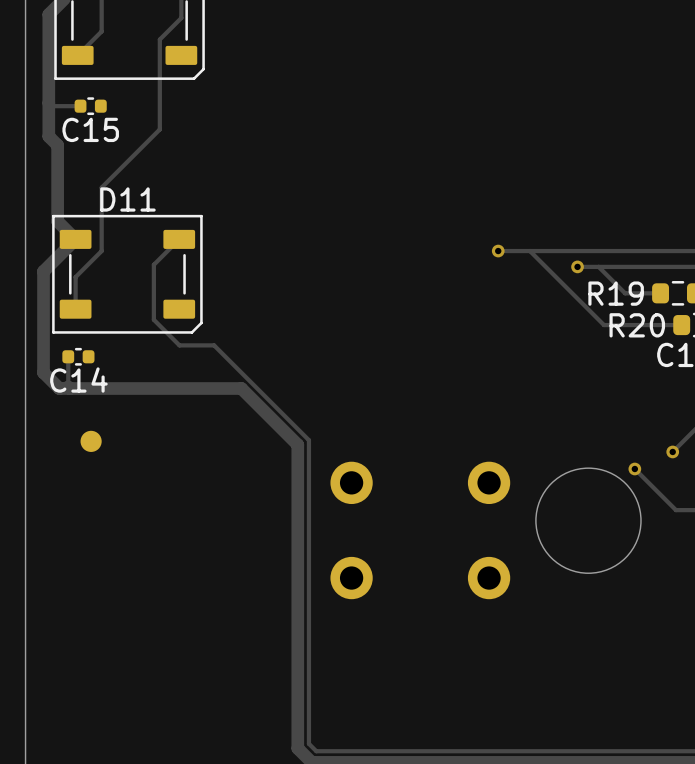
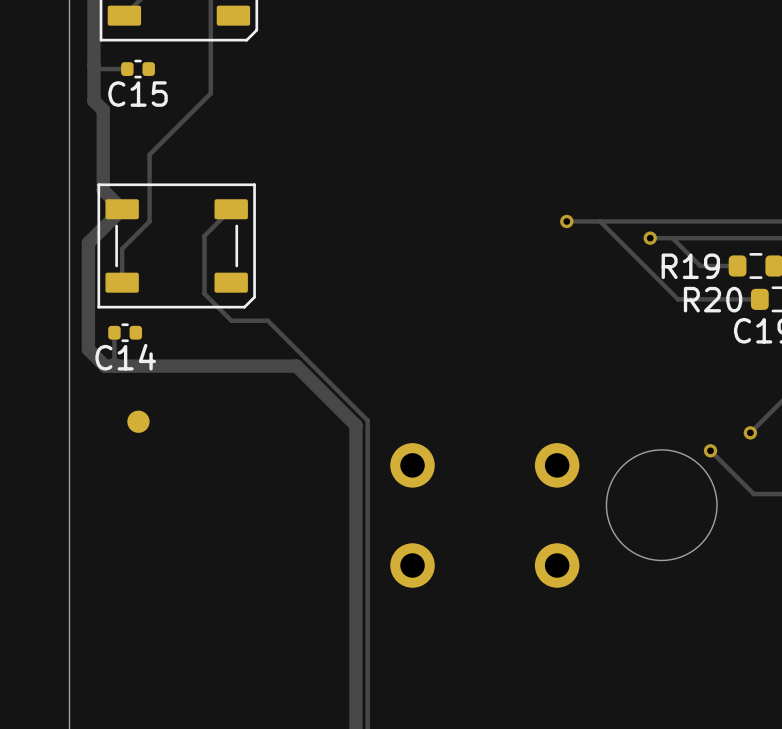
D11 name: D11 (127, 199) -> none

